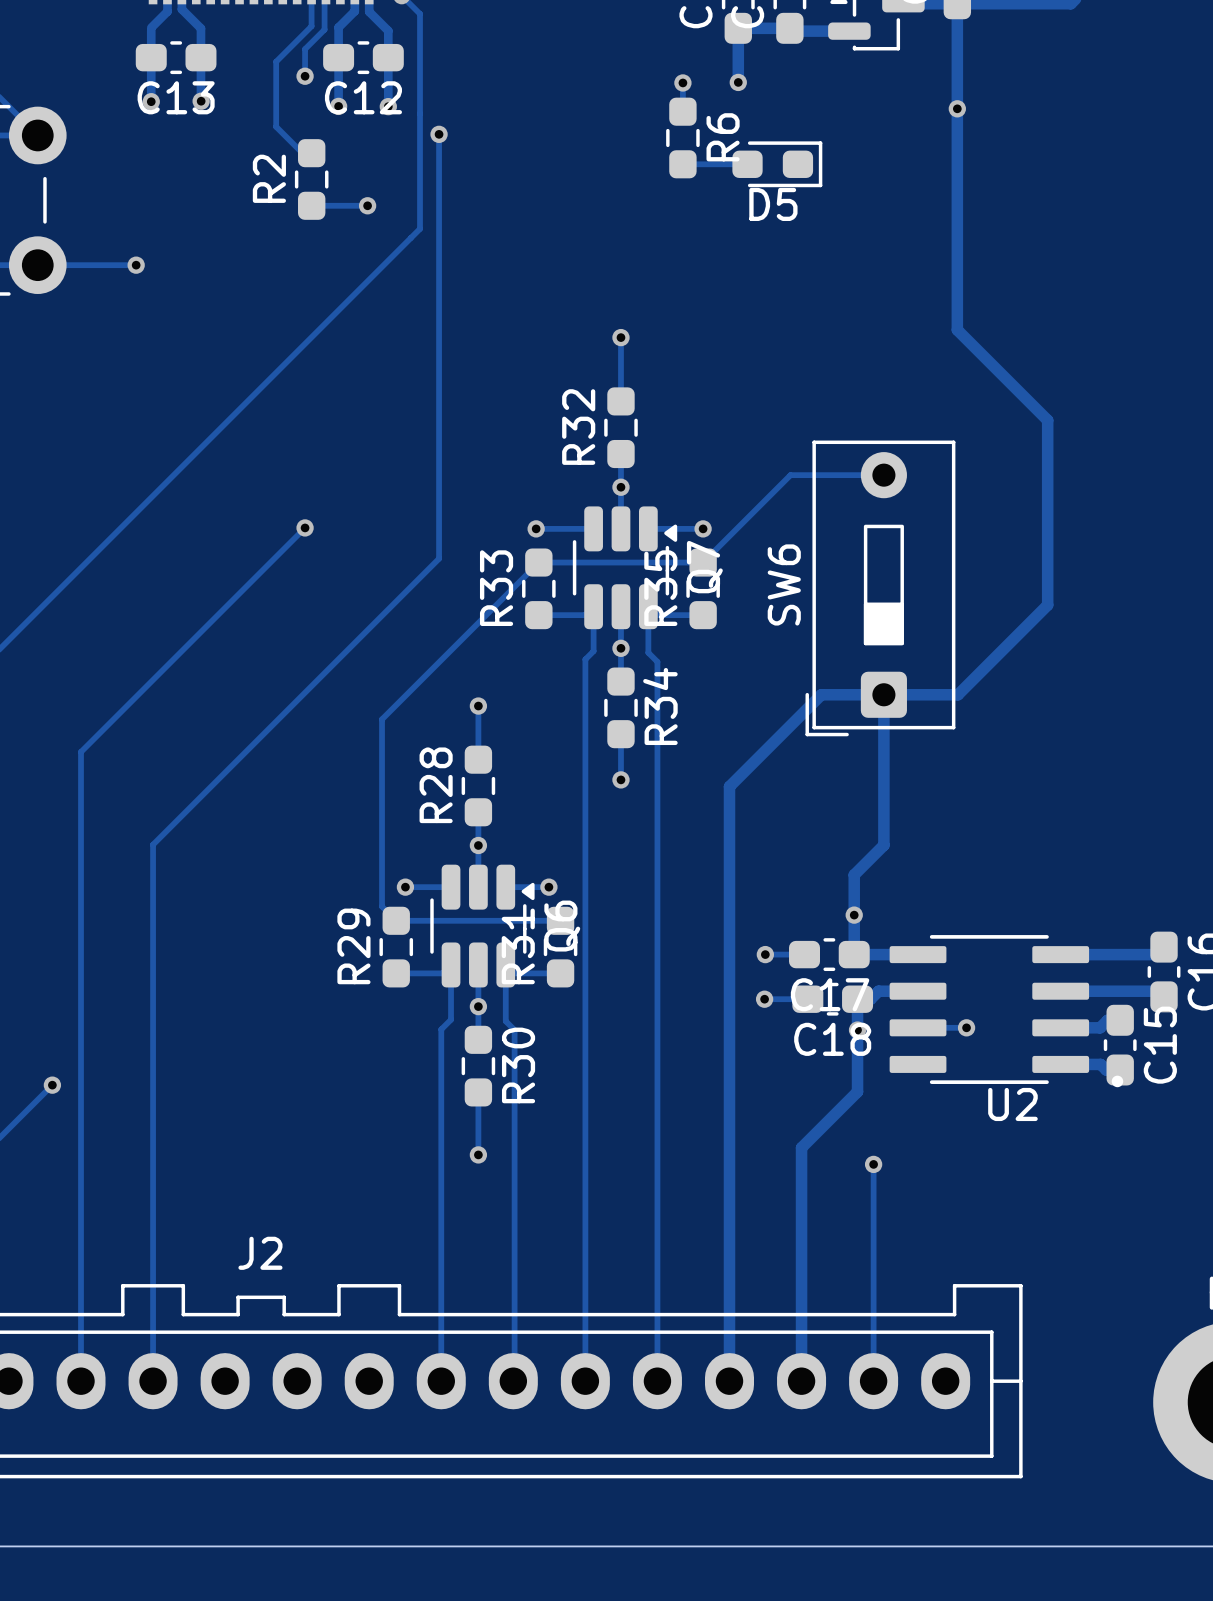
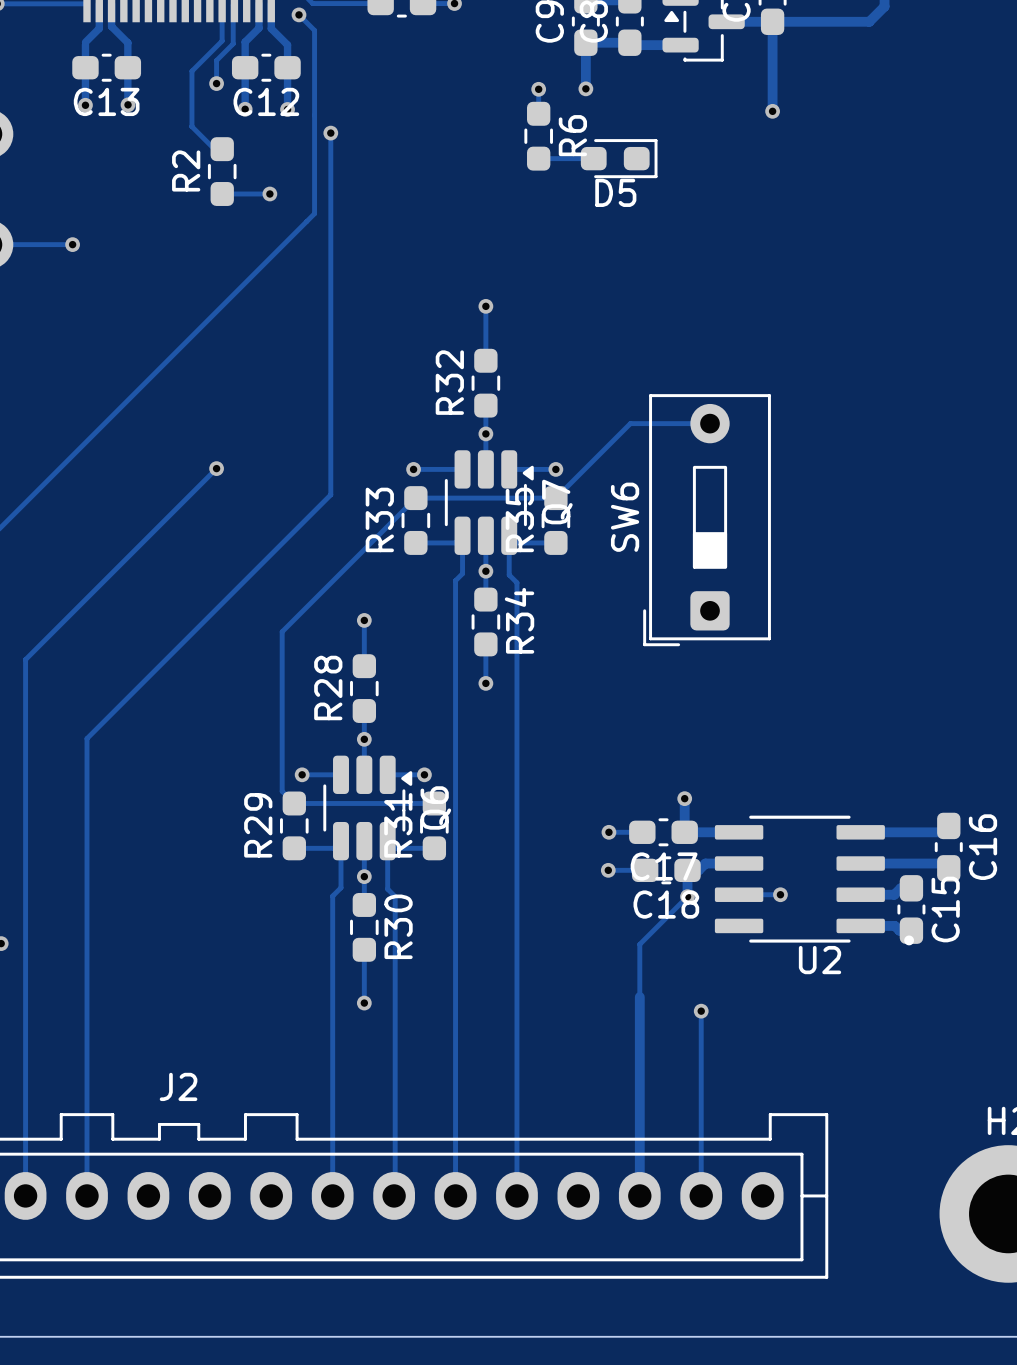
track: (957, 108) (957, 329) (1047, 420) (1047, 605) (958, 694) (821, 694) (729, 786) (729, 1381) -> none
track: (883, 694) (883, 845) (854, 874) (854, 915) -> none
track: (857, 1030) (857, 1091) (801, 1147) -> (687, 896) (639, 944) (639, 997)

